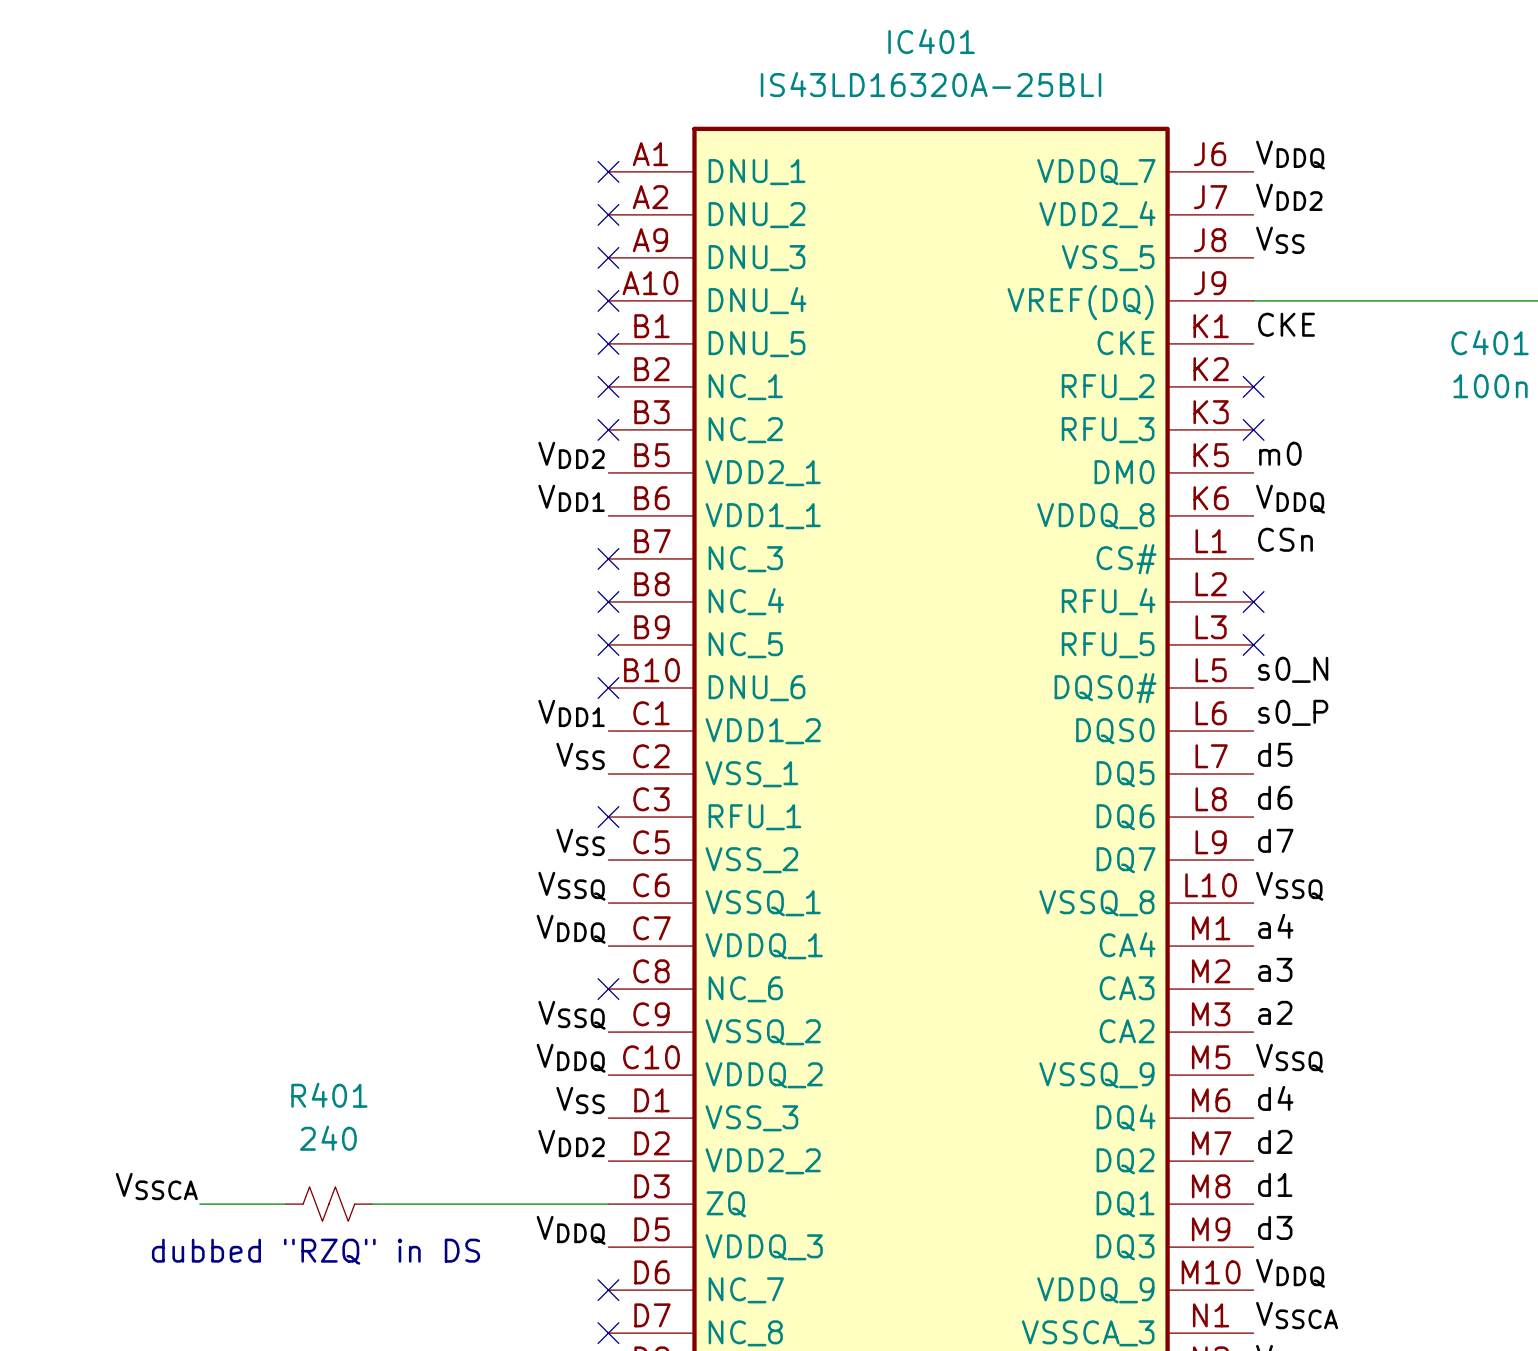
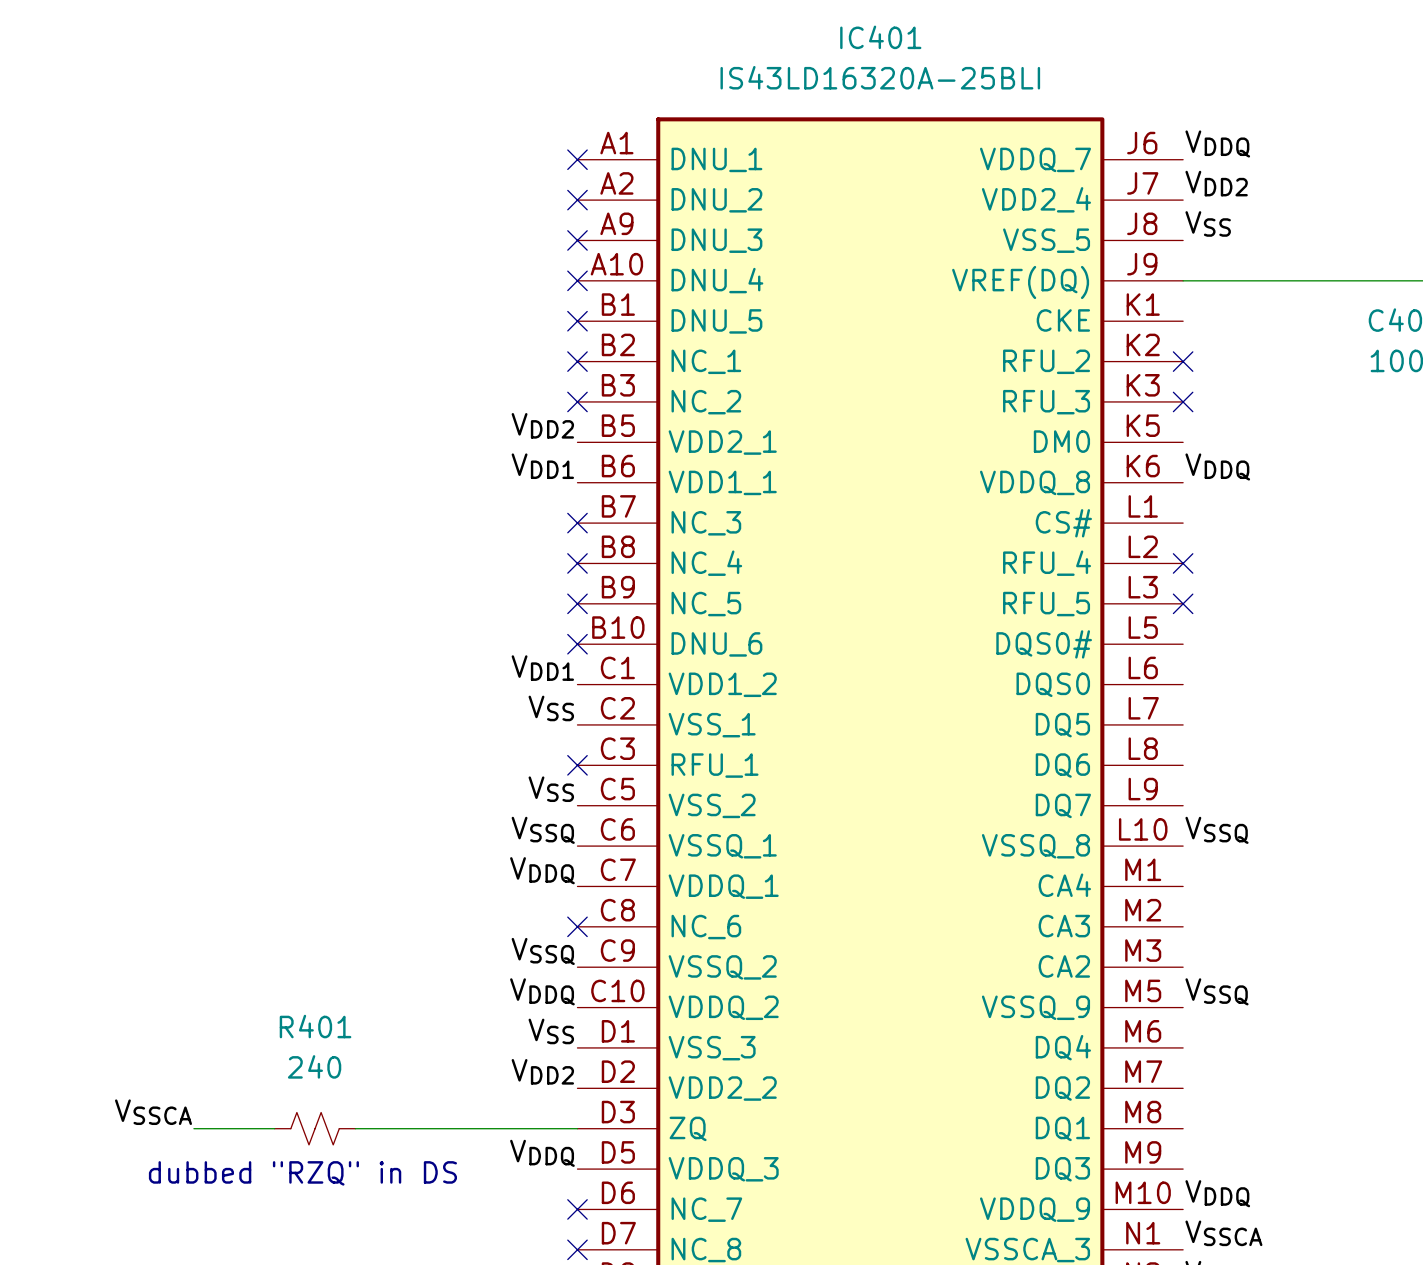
label: CKE (1286, 324) -> none
label: m0 (1280, 453) -> none
label: CSn (1285, 539) -> none
label: s0_N (1293, 669) -> none
label: s0_P (1293, 712) -> none
label: d5 (1275, 754) -> none
label: d6 (1275, 797) -> none
label: d7 (1275, 840) -> none
label: a4 (1275, 926) -> none
label: a3 (1275, 969) -> none
label: a2 (1275, 1012) -> none
label: d4 (1275, 1098) -> none
label: d2 (1275, 1141) -> none
label: d1 (1275, 1184) -> none
label: d3 (1275, 1227) -> none

